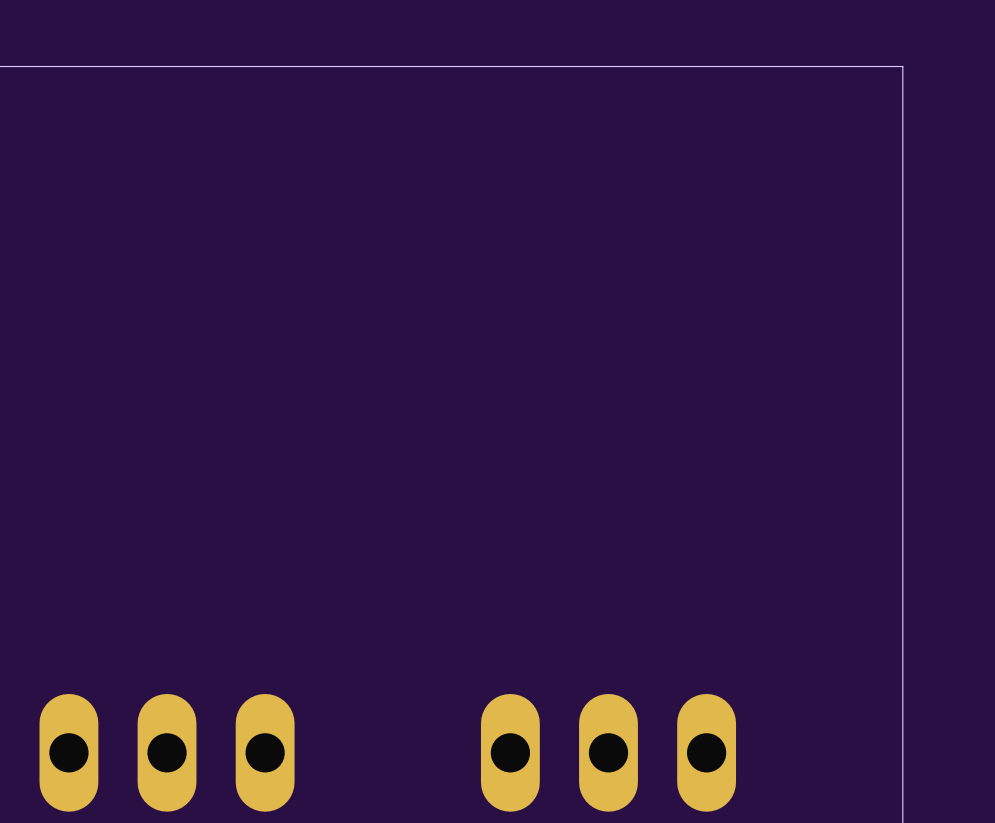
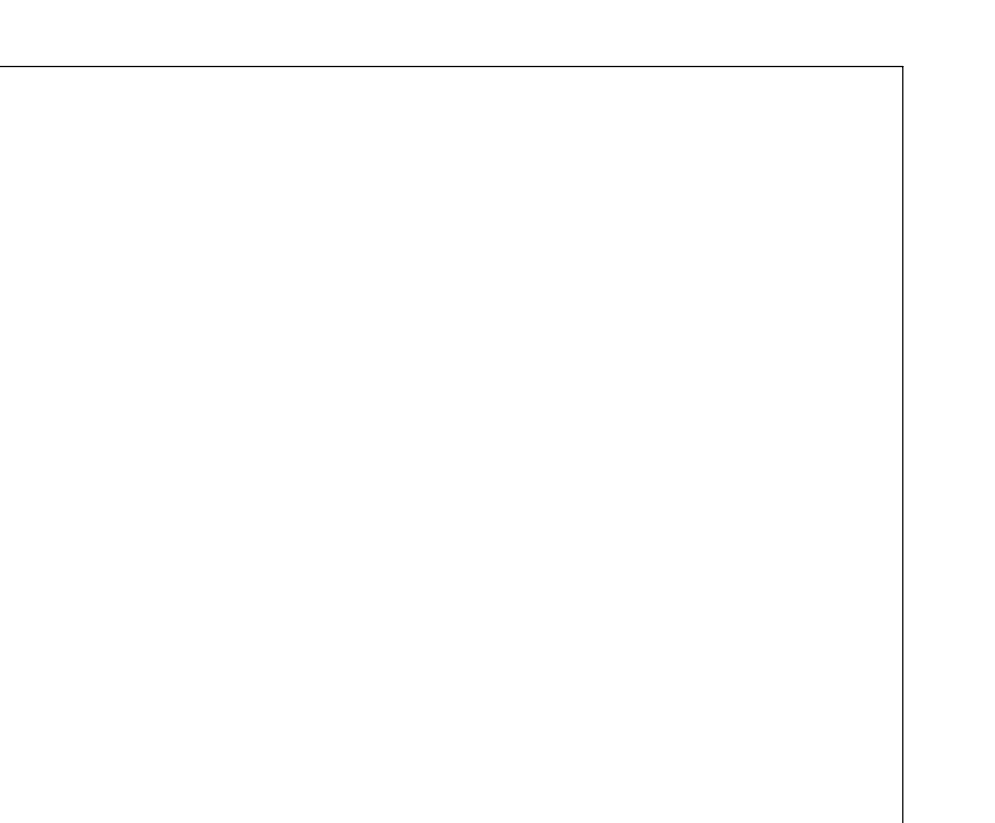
part: (167, 752) -> none
part: (608, 752) -> none

